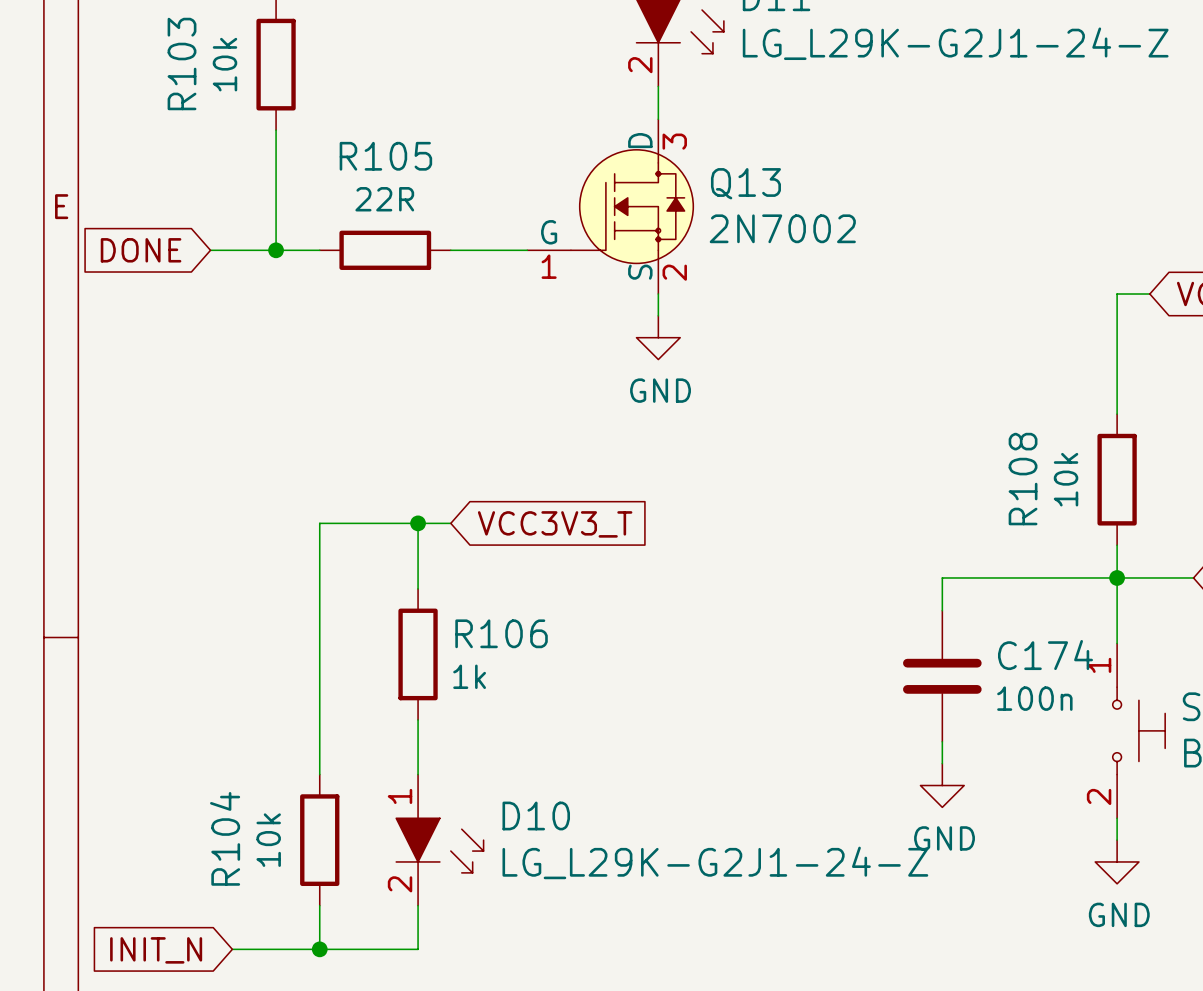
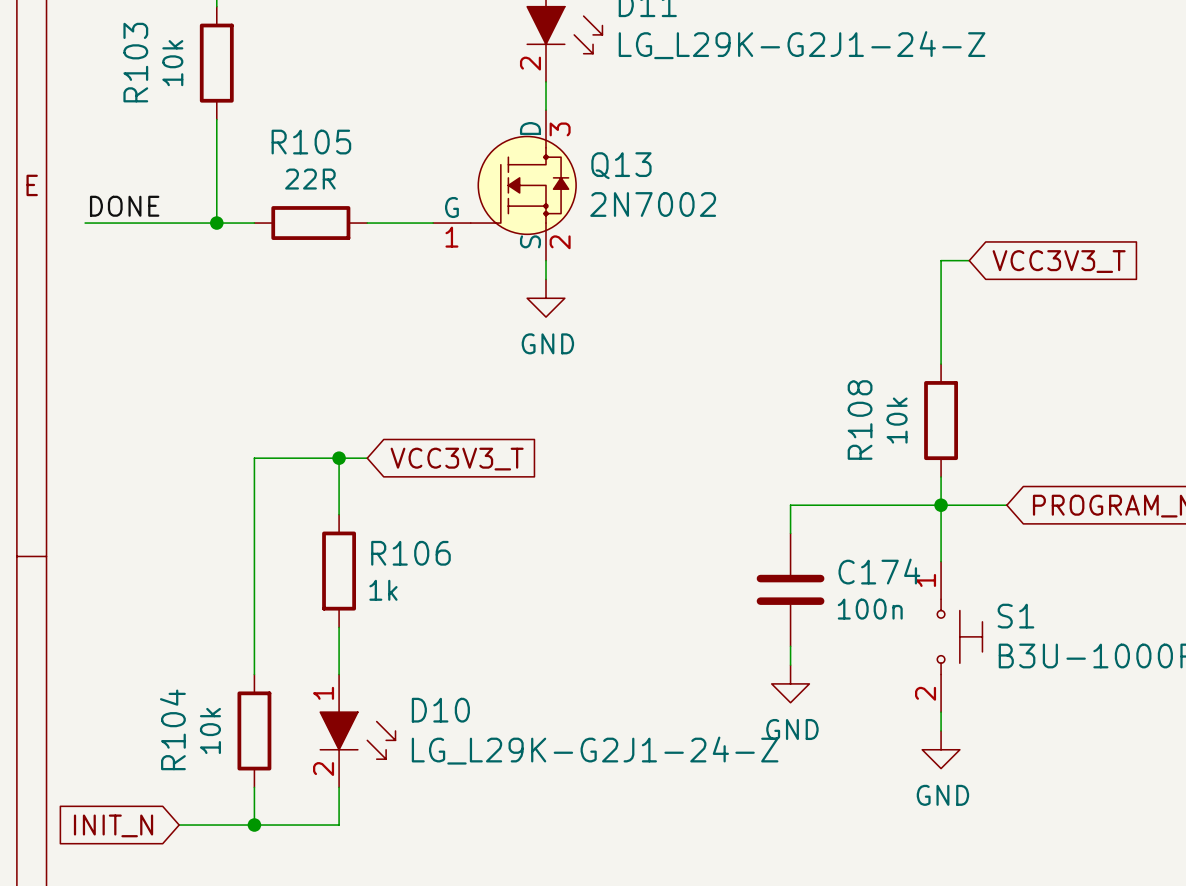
label: none -> DONE (124, 206)
wire: none -> (85, 223) (160, 223)
global label: DONE (141, 250) -> none

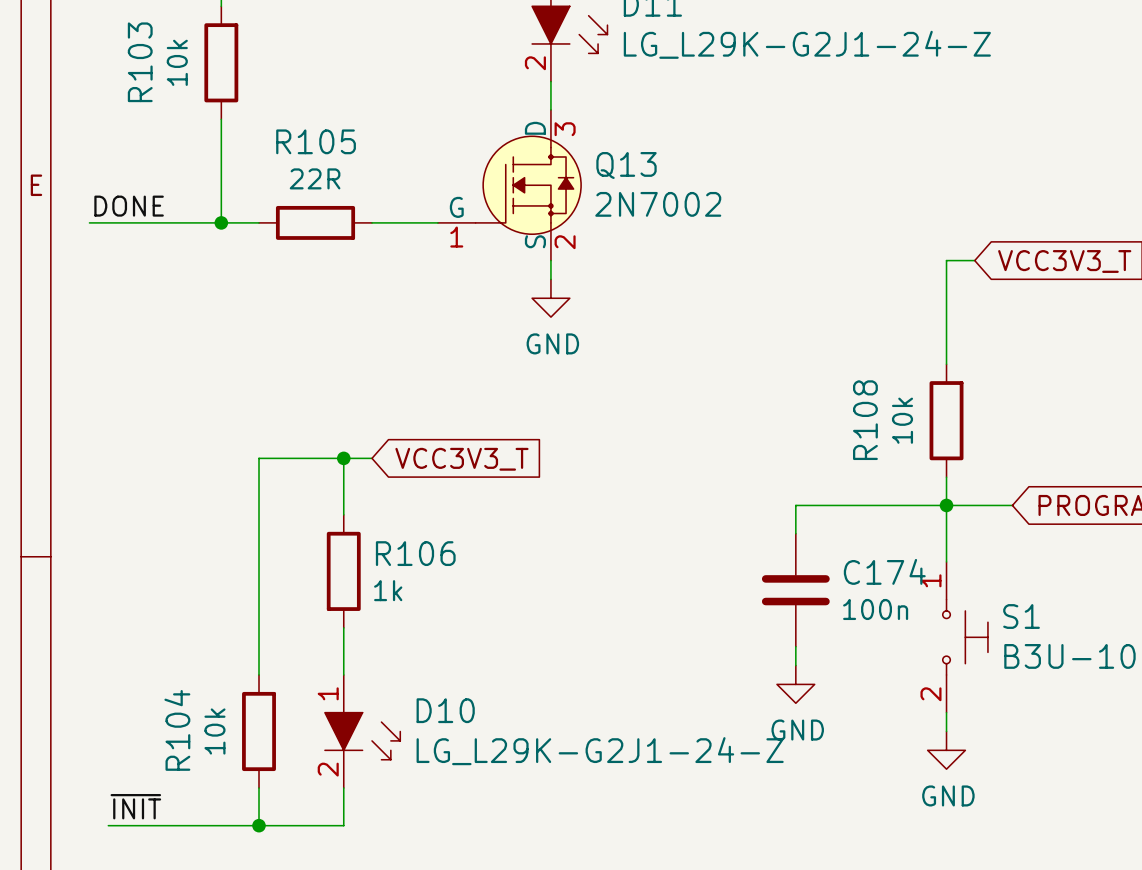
label: none -> ~{INIT} (135, 806)
wire: none -> (108, 825) (183, 825)
global label: INIT_N (113, 825) -> none

